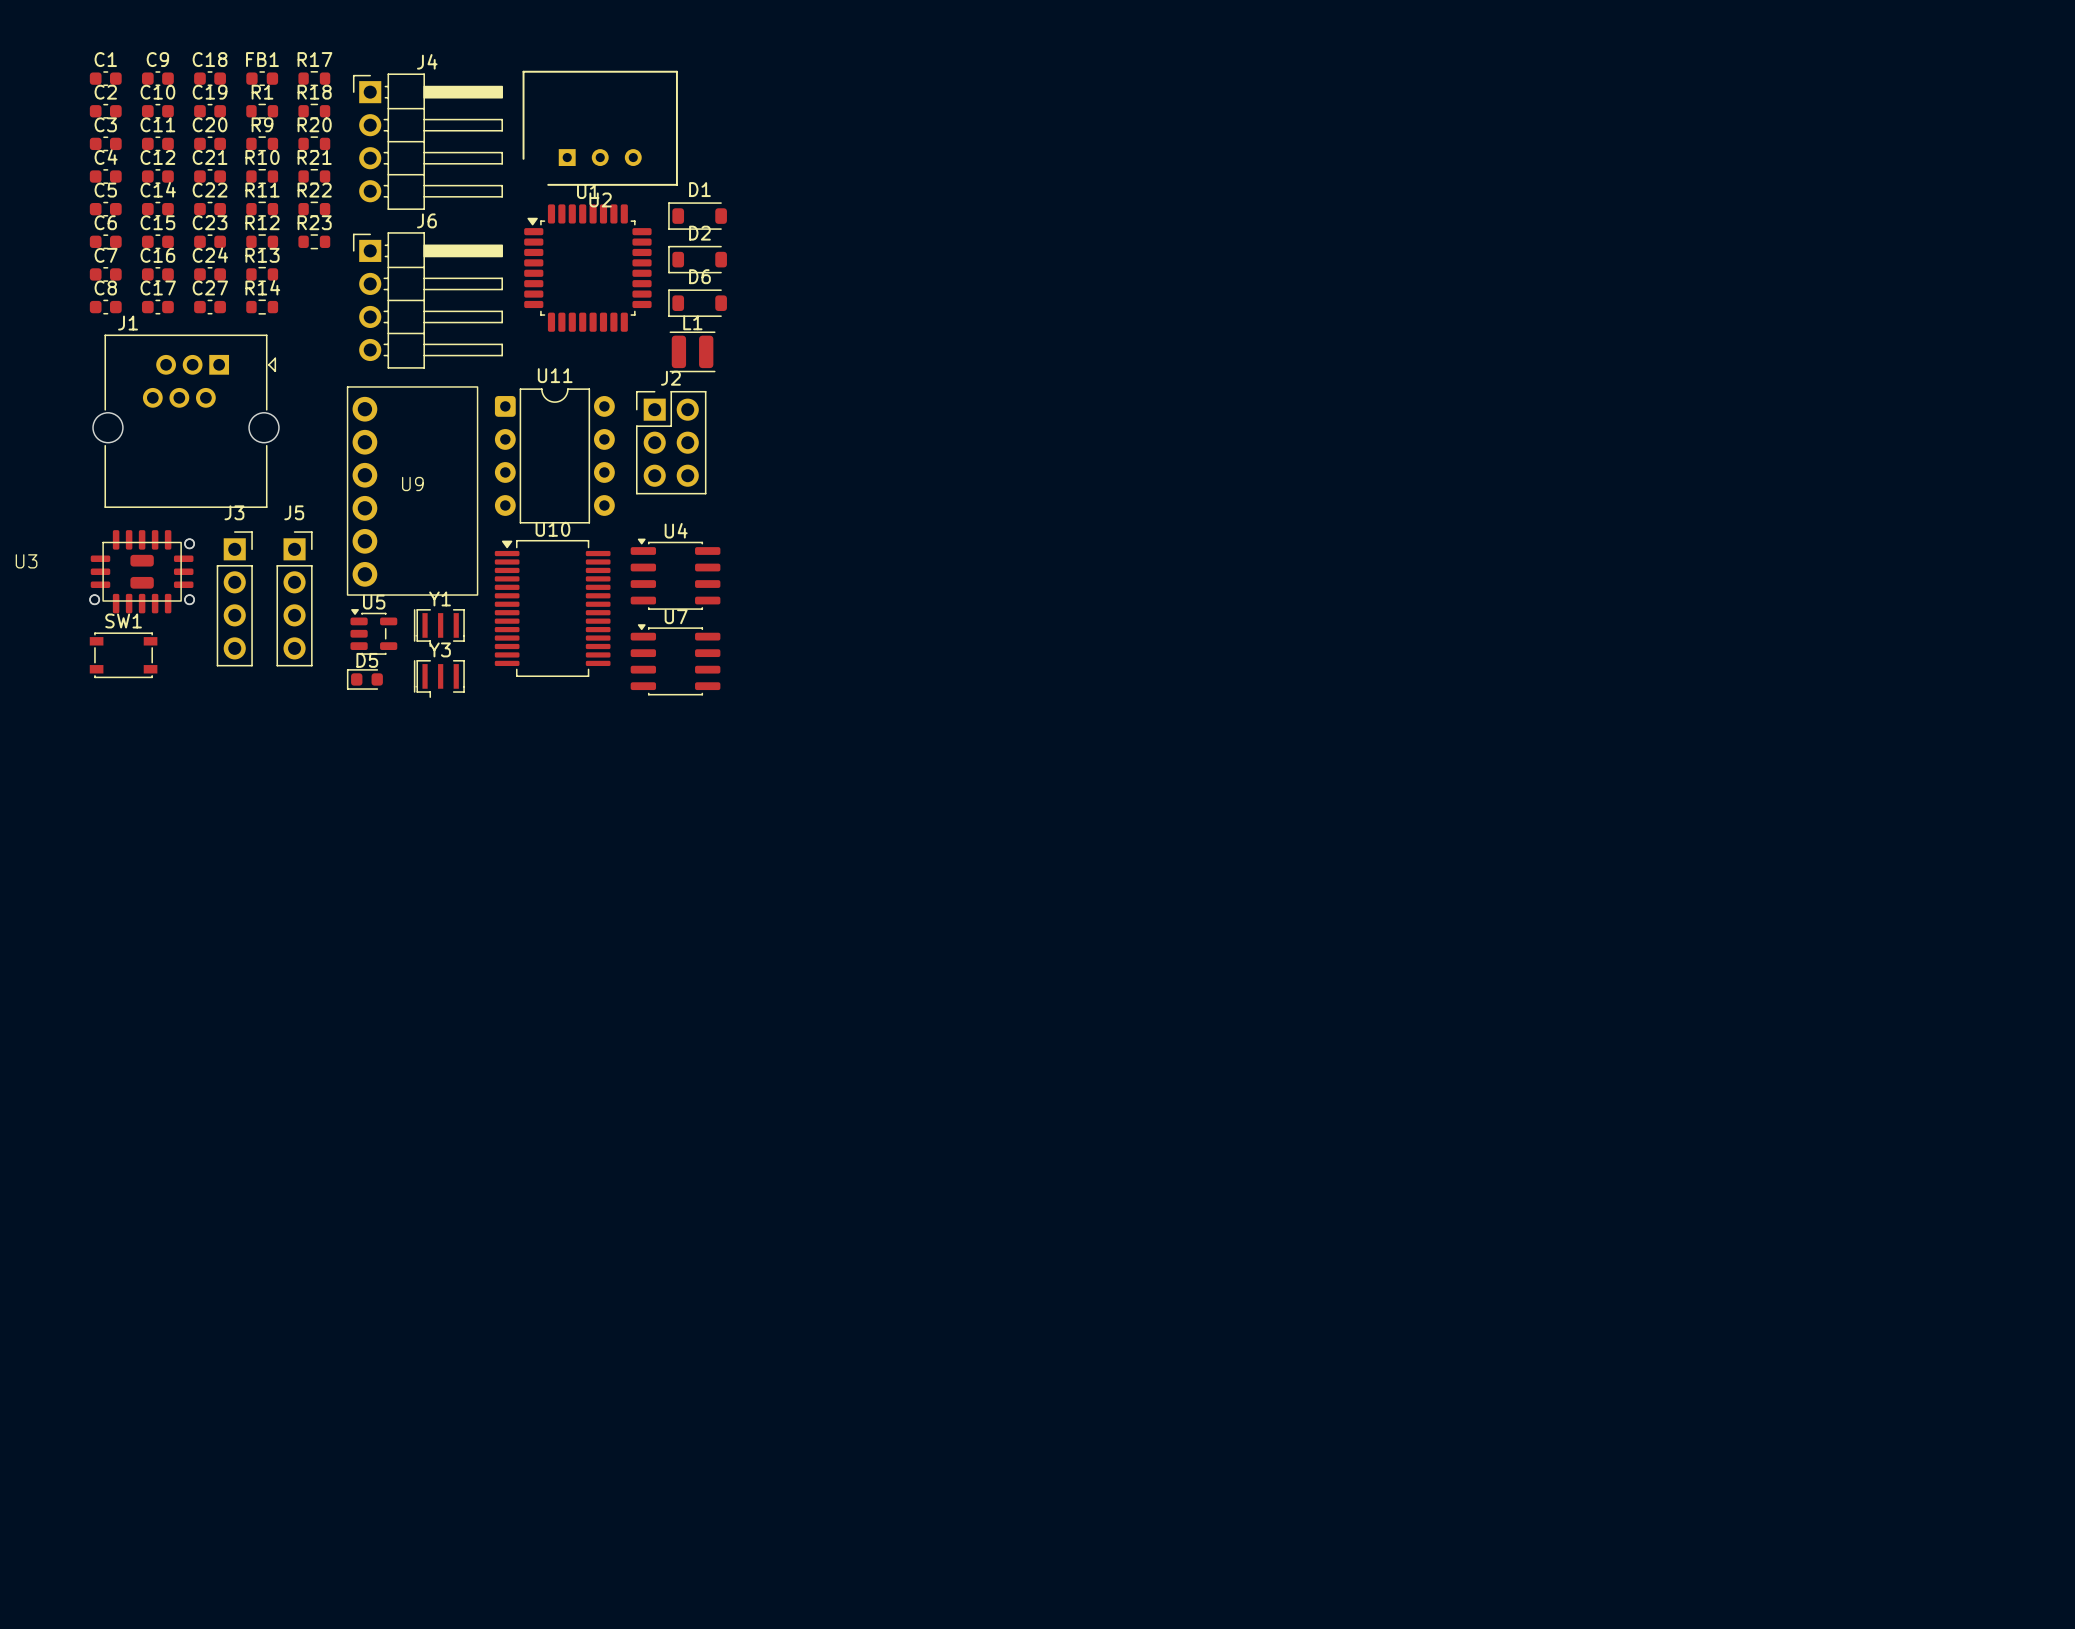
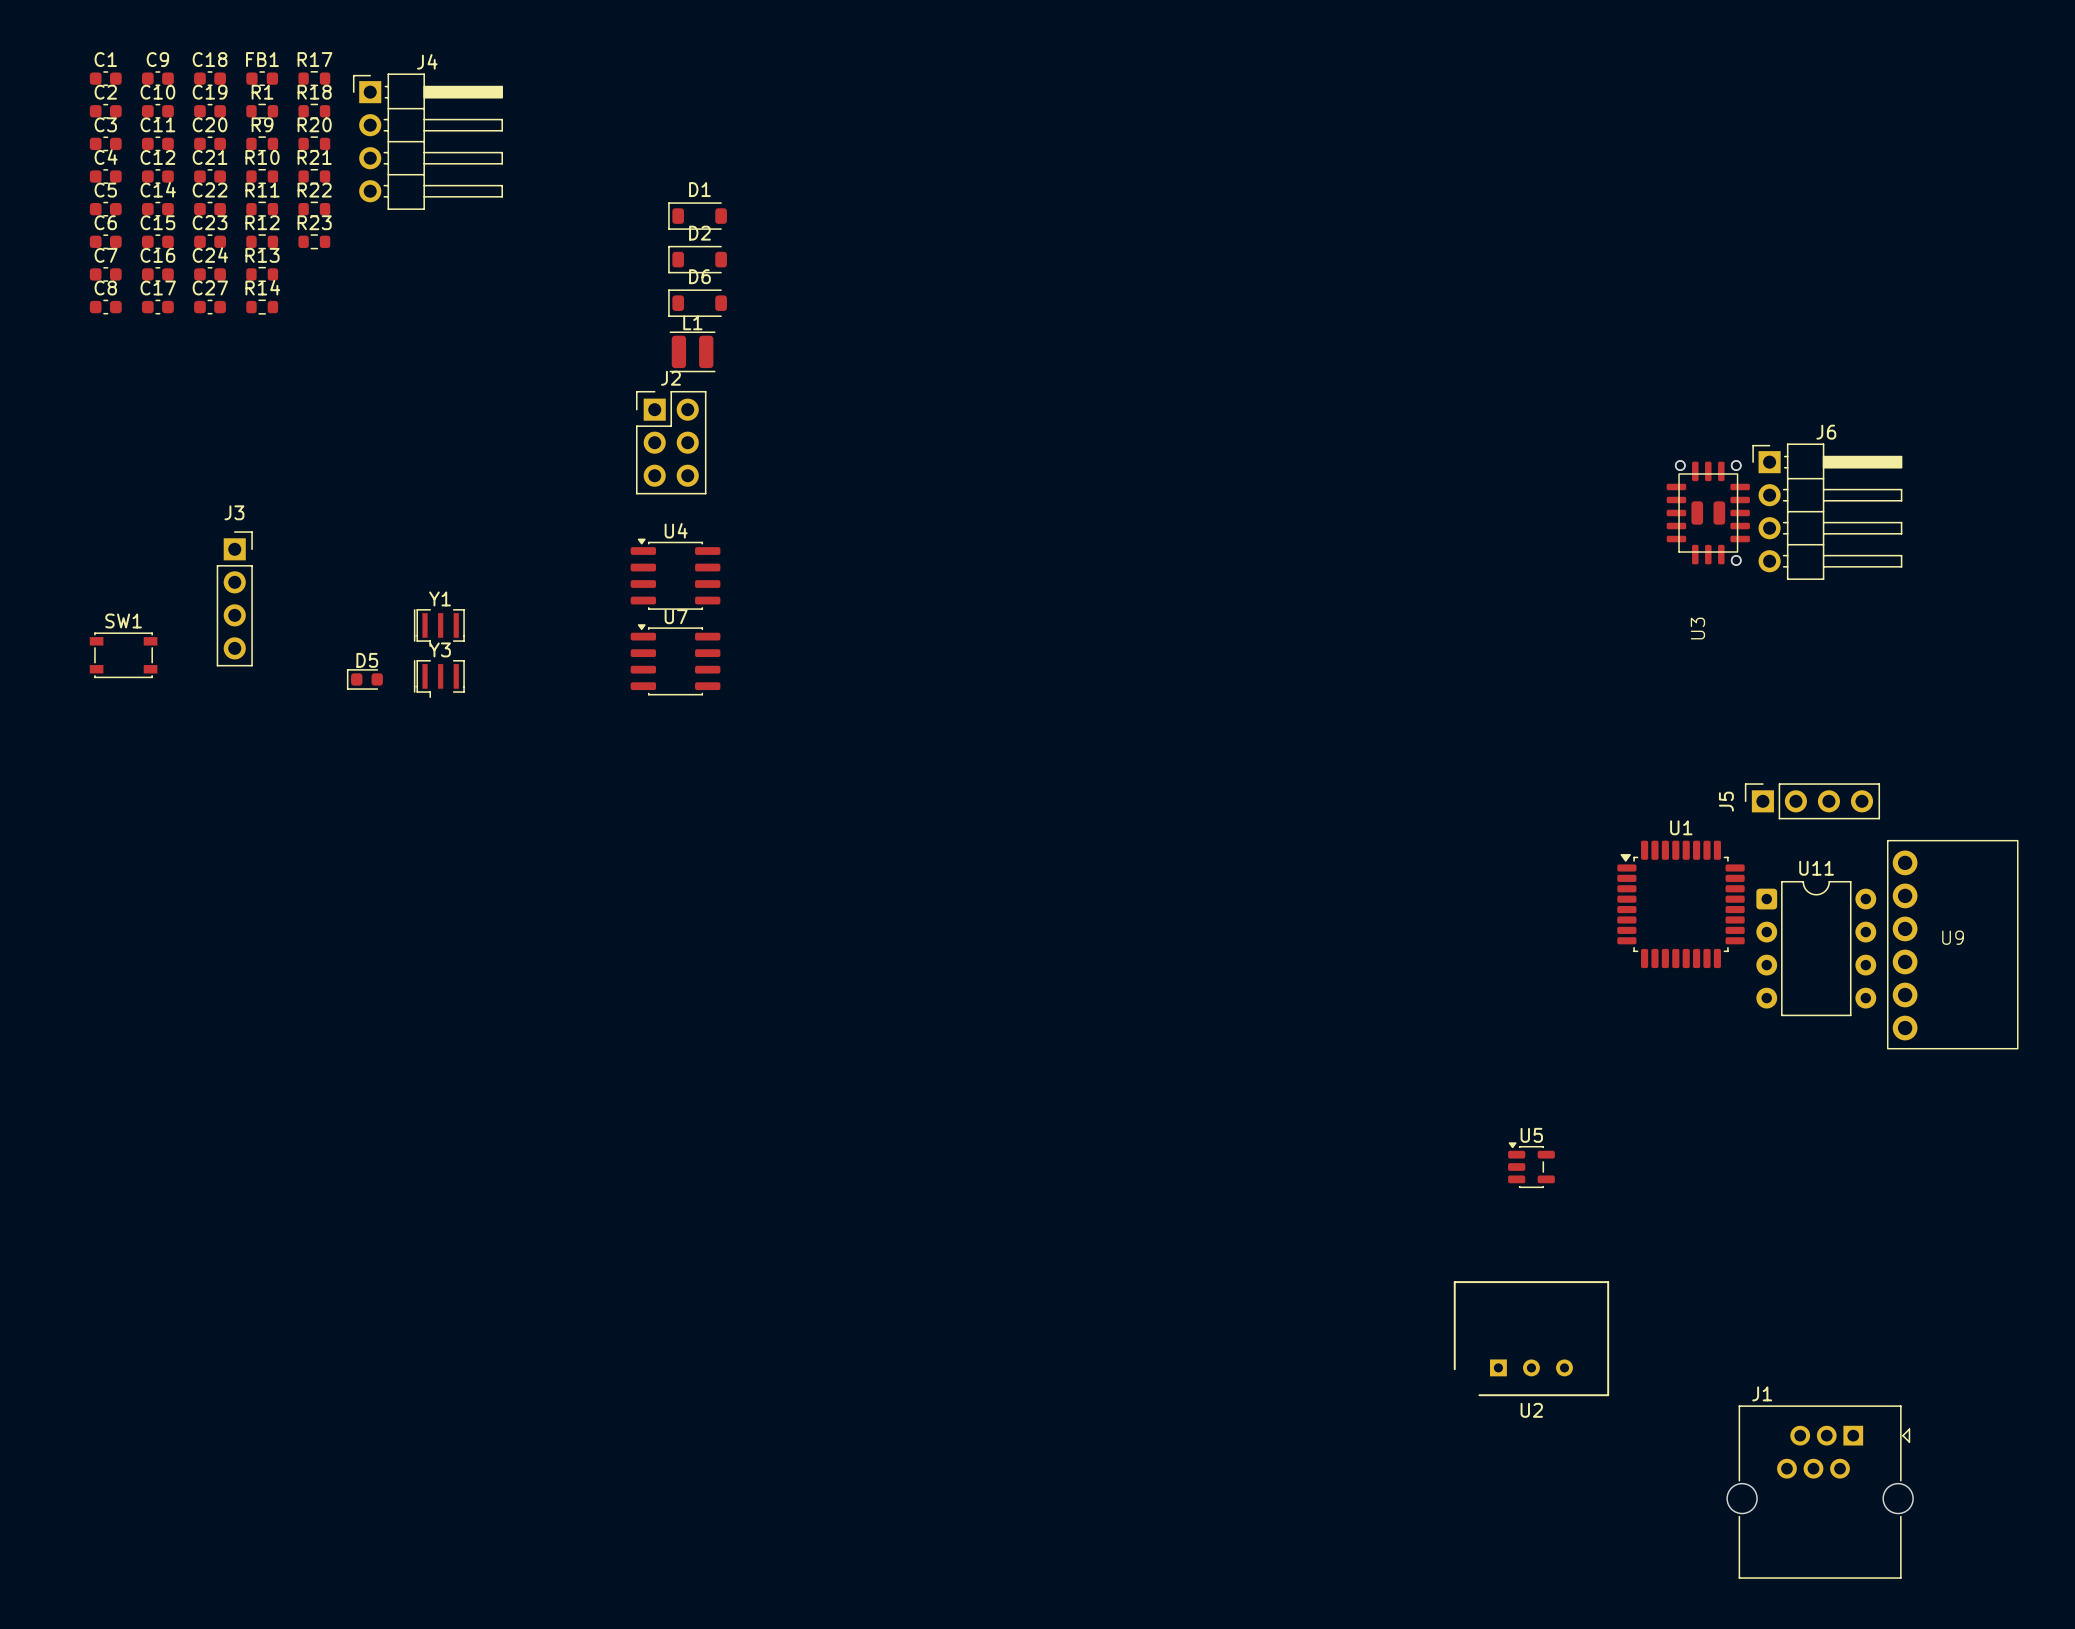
U2 position: (600, 128) -> (1531, 1338)
U1 position: (587, 268) -> (1680, 904)
J6 position: (427, 300) -> (1827, 511)
J1 position: (185, 421) -> (1820, 1492)
U11 position: (554, 455) -> (1816, 948)
U9 position: (412, 491) -> (1952, 944)
U3 rotation: 0° (142, 571) -> 90° counterclockwise (1708, 513)
U3 position: (142, 571) -> (1708, 513)
J5 rotation: 0° (294, 598) -> 90° counterclockwise (1812, 801)
J5 position: (294, 598) -> (1812, 801)
U10: (552, 608) -> none
U5 position: (373, 631) -> (1531, 1165)

